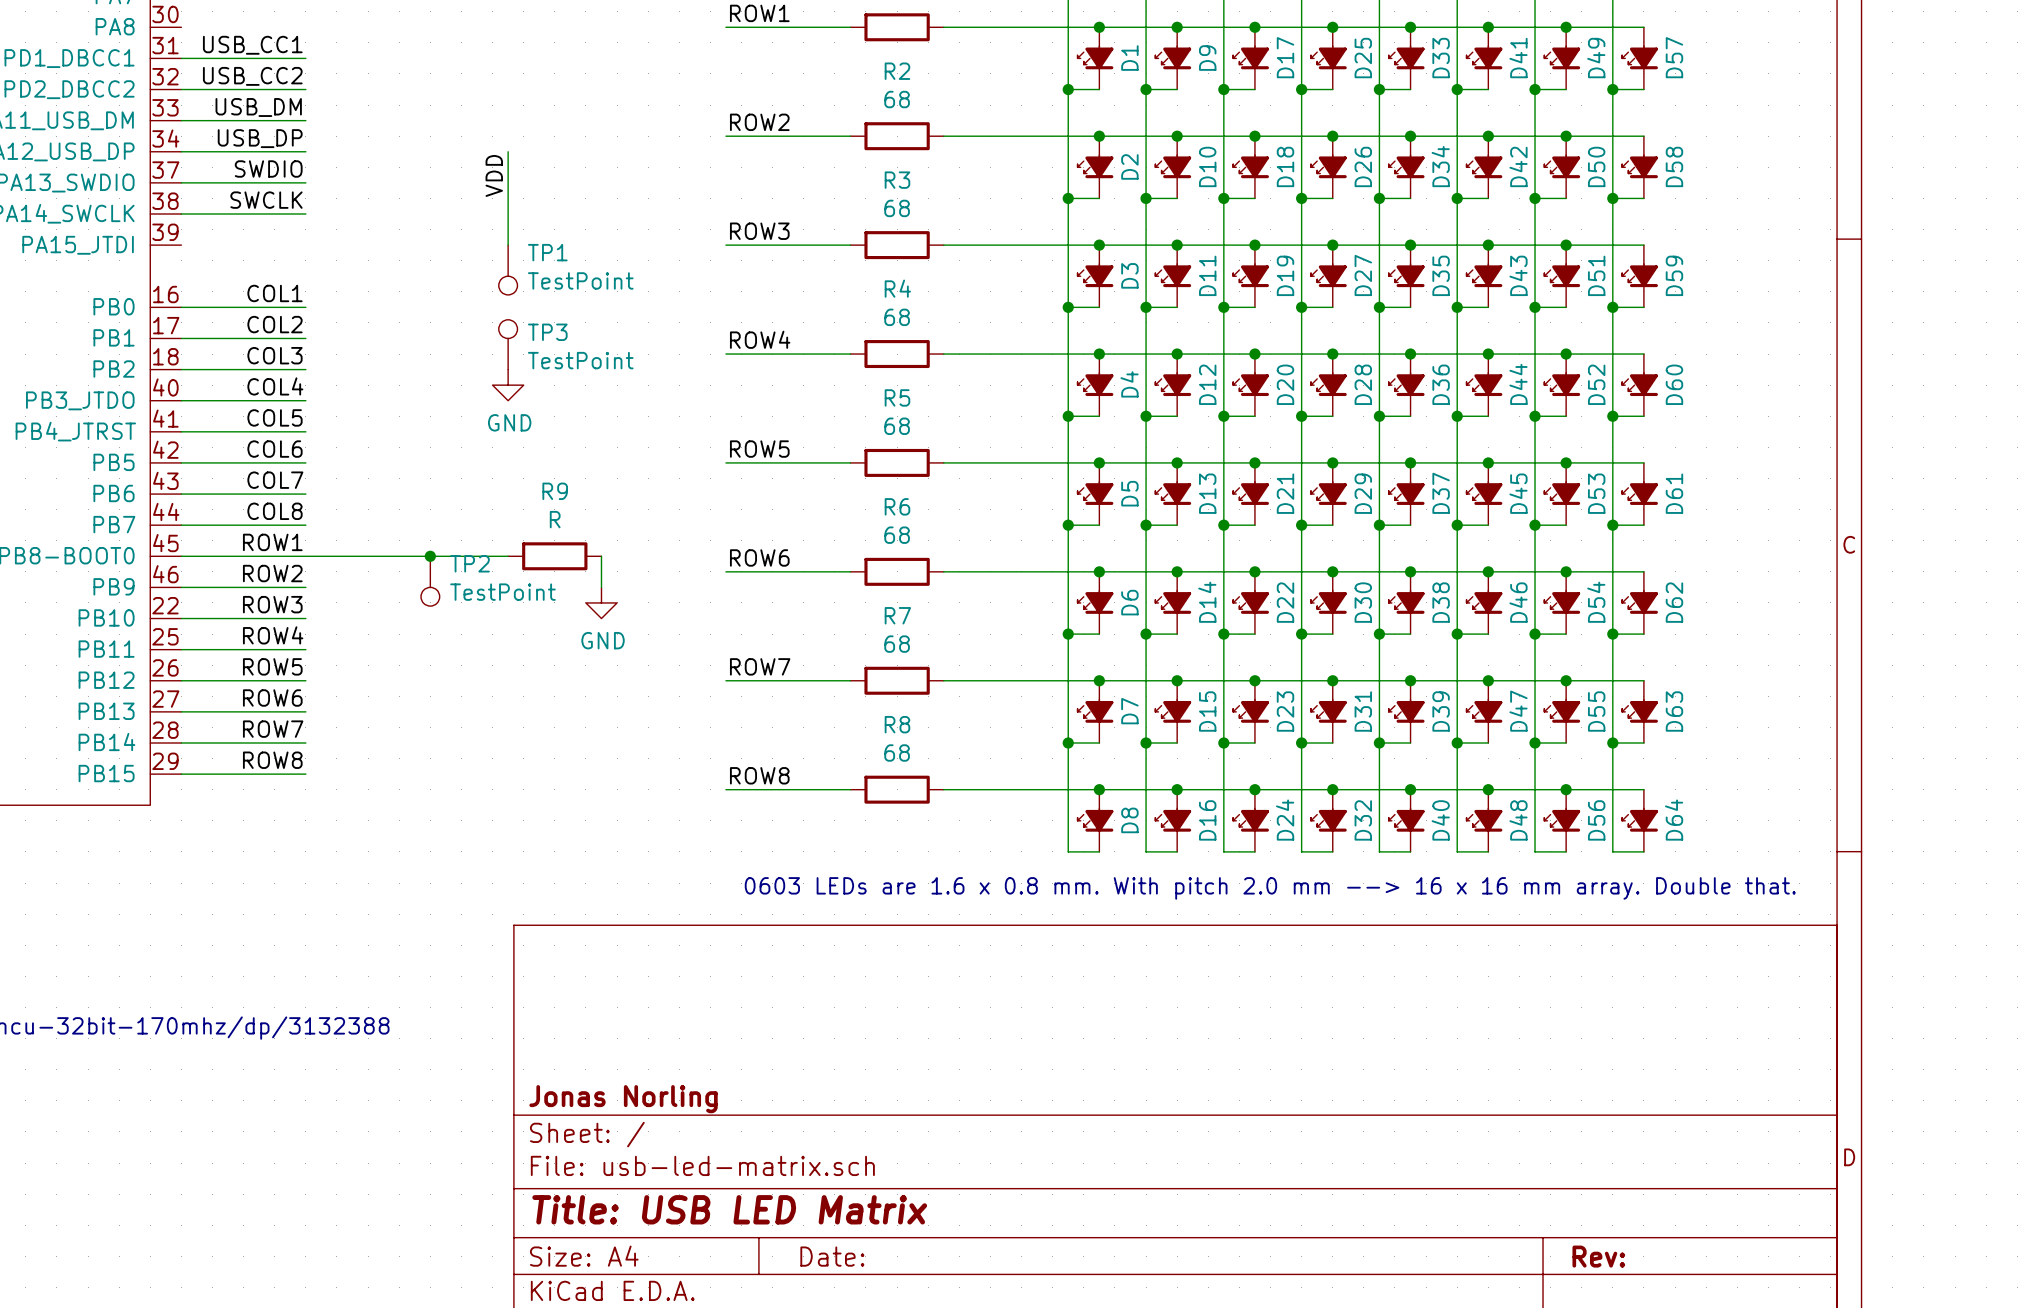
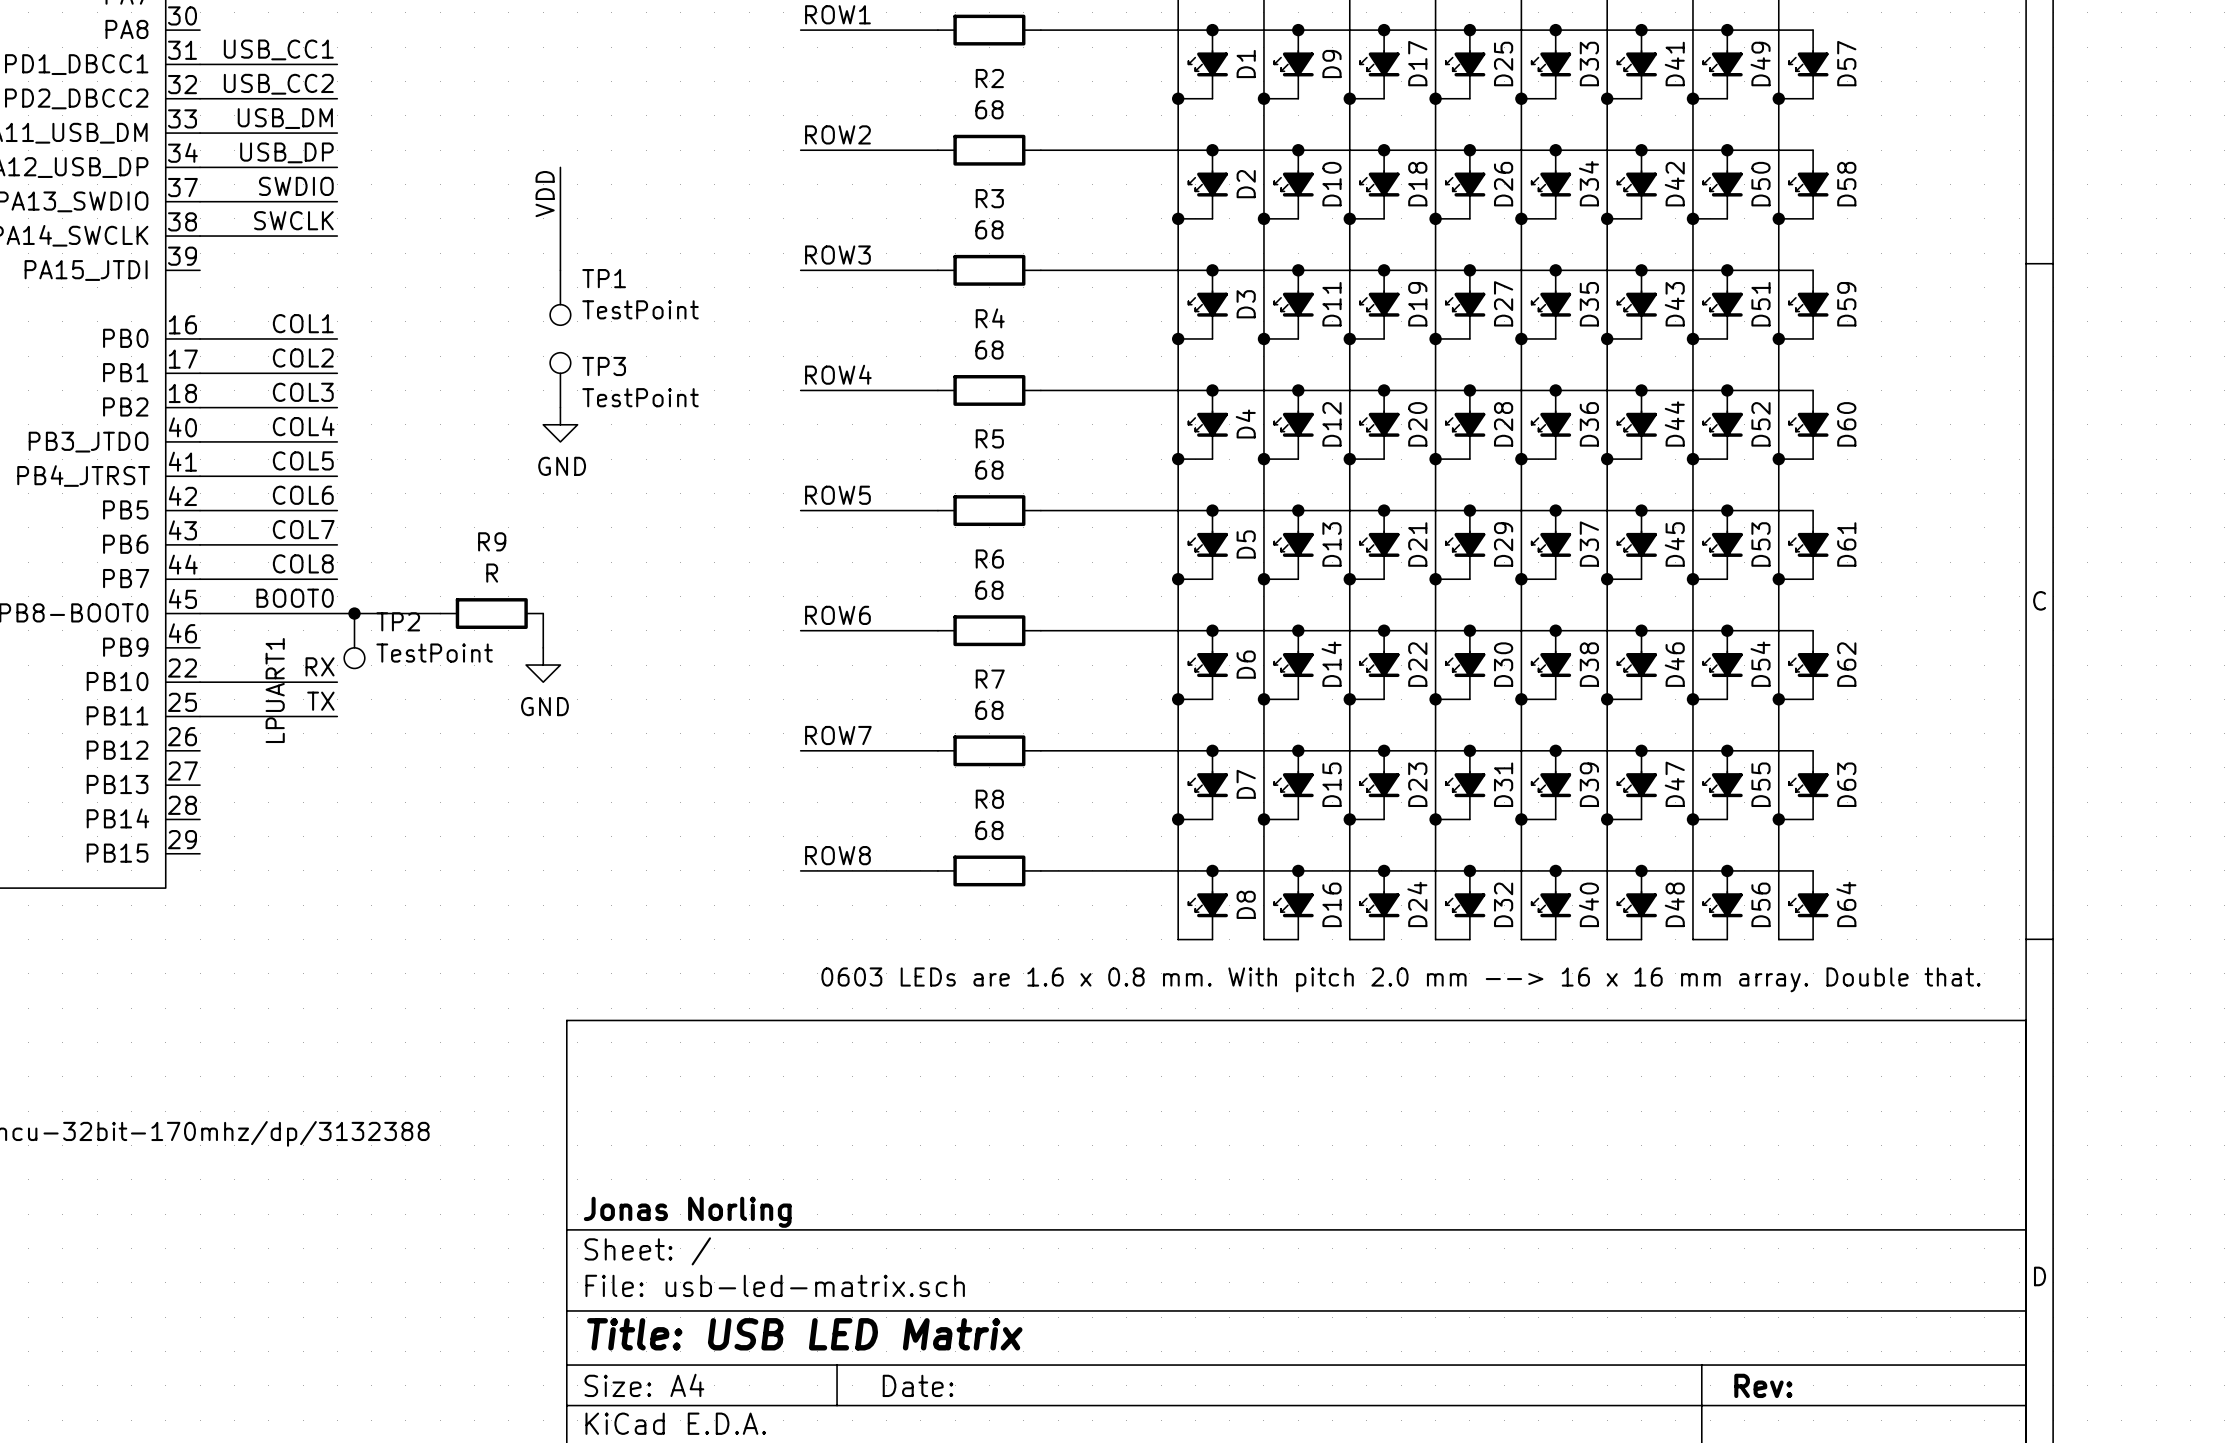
label: ROW1 (272, 542) -> BOOT0 (295, 598)
junction: none -> (354, 613)
wire: (399, 556) (508, 556) -> none
junction: (430, 556) -> none
R9 position: (554, 556) -> (491, 613)
wire: (601, 556) (601, 587) -> (543, 613) (543, 647)
label: ROW2 (272, 573) -> none
TP2 position: (430, 581) -> (354, 640)
wire: (181, 587) (305, 587) -> none
power symbol position: GND (601, 602) -> GND (543, 665)
label: ROW3 (272, 604) -> RX (320, 666)
text: none -> LPUART1 (275, 690)
label: ROW4 (273, 635) -> TX (320, 701)
label: ROW5 (272, 666) -> none
wire: (181, 680) (305, 680) -> none
label: ROW6 (272, 698) -> none
wire: (181, 711) (305, 711) -> none
label: ROW7 (273, 729) -> none
wire: (181, 743) (305, 743) -> none
label: ROW8 (272, 760) -> none
wire: (181, 774) (305, 774) -> none

